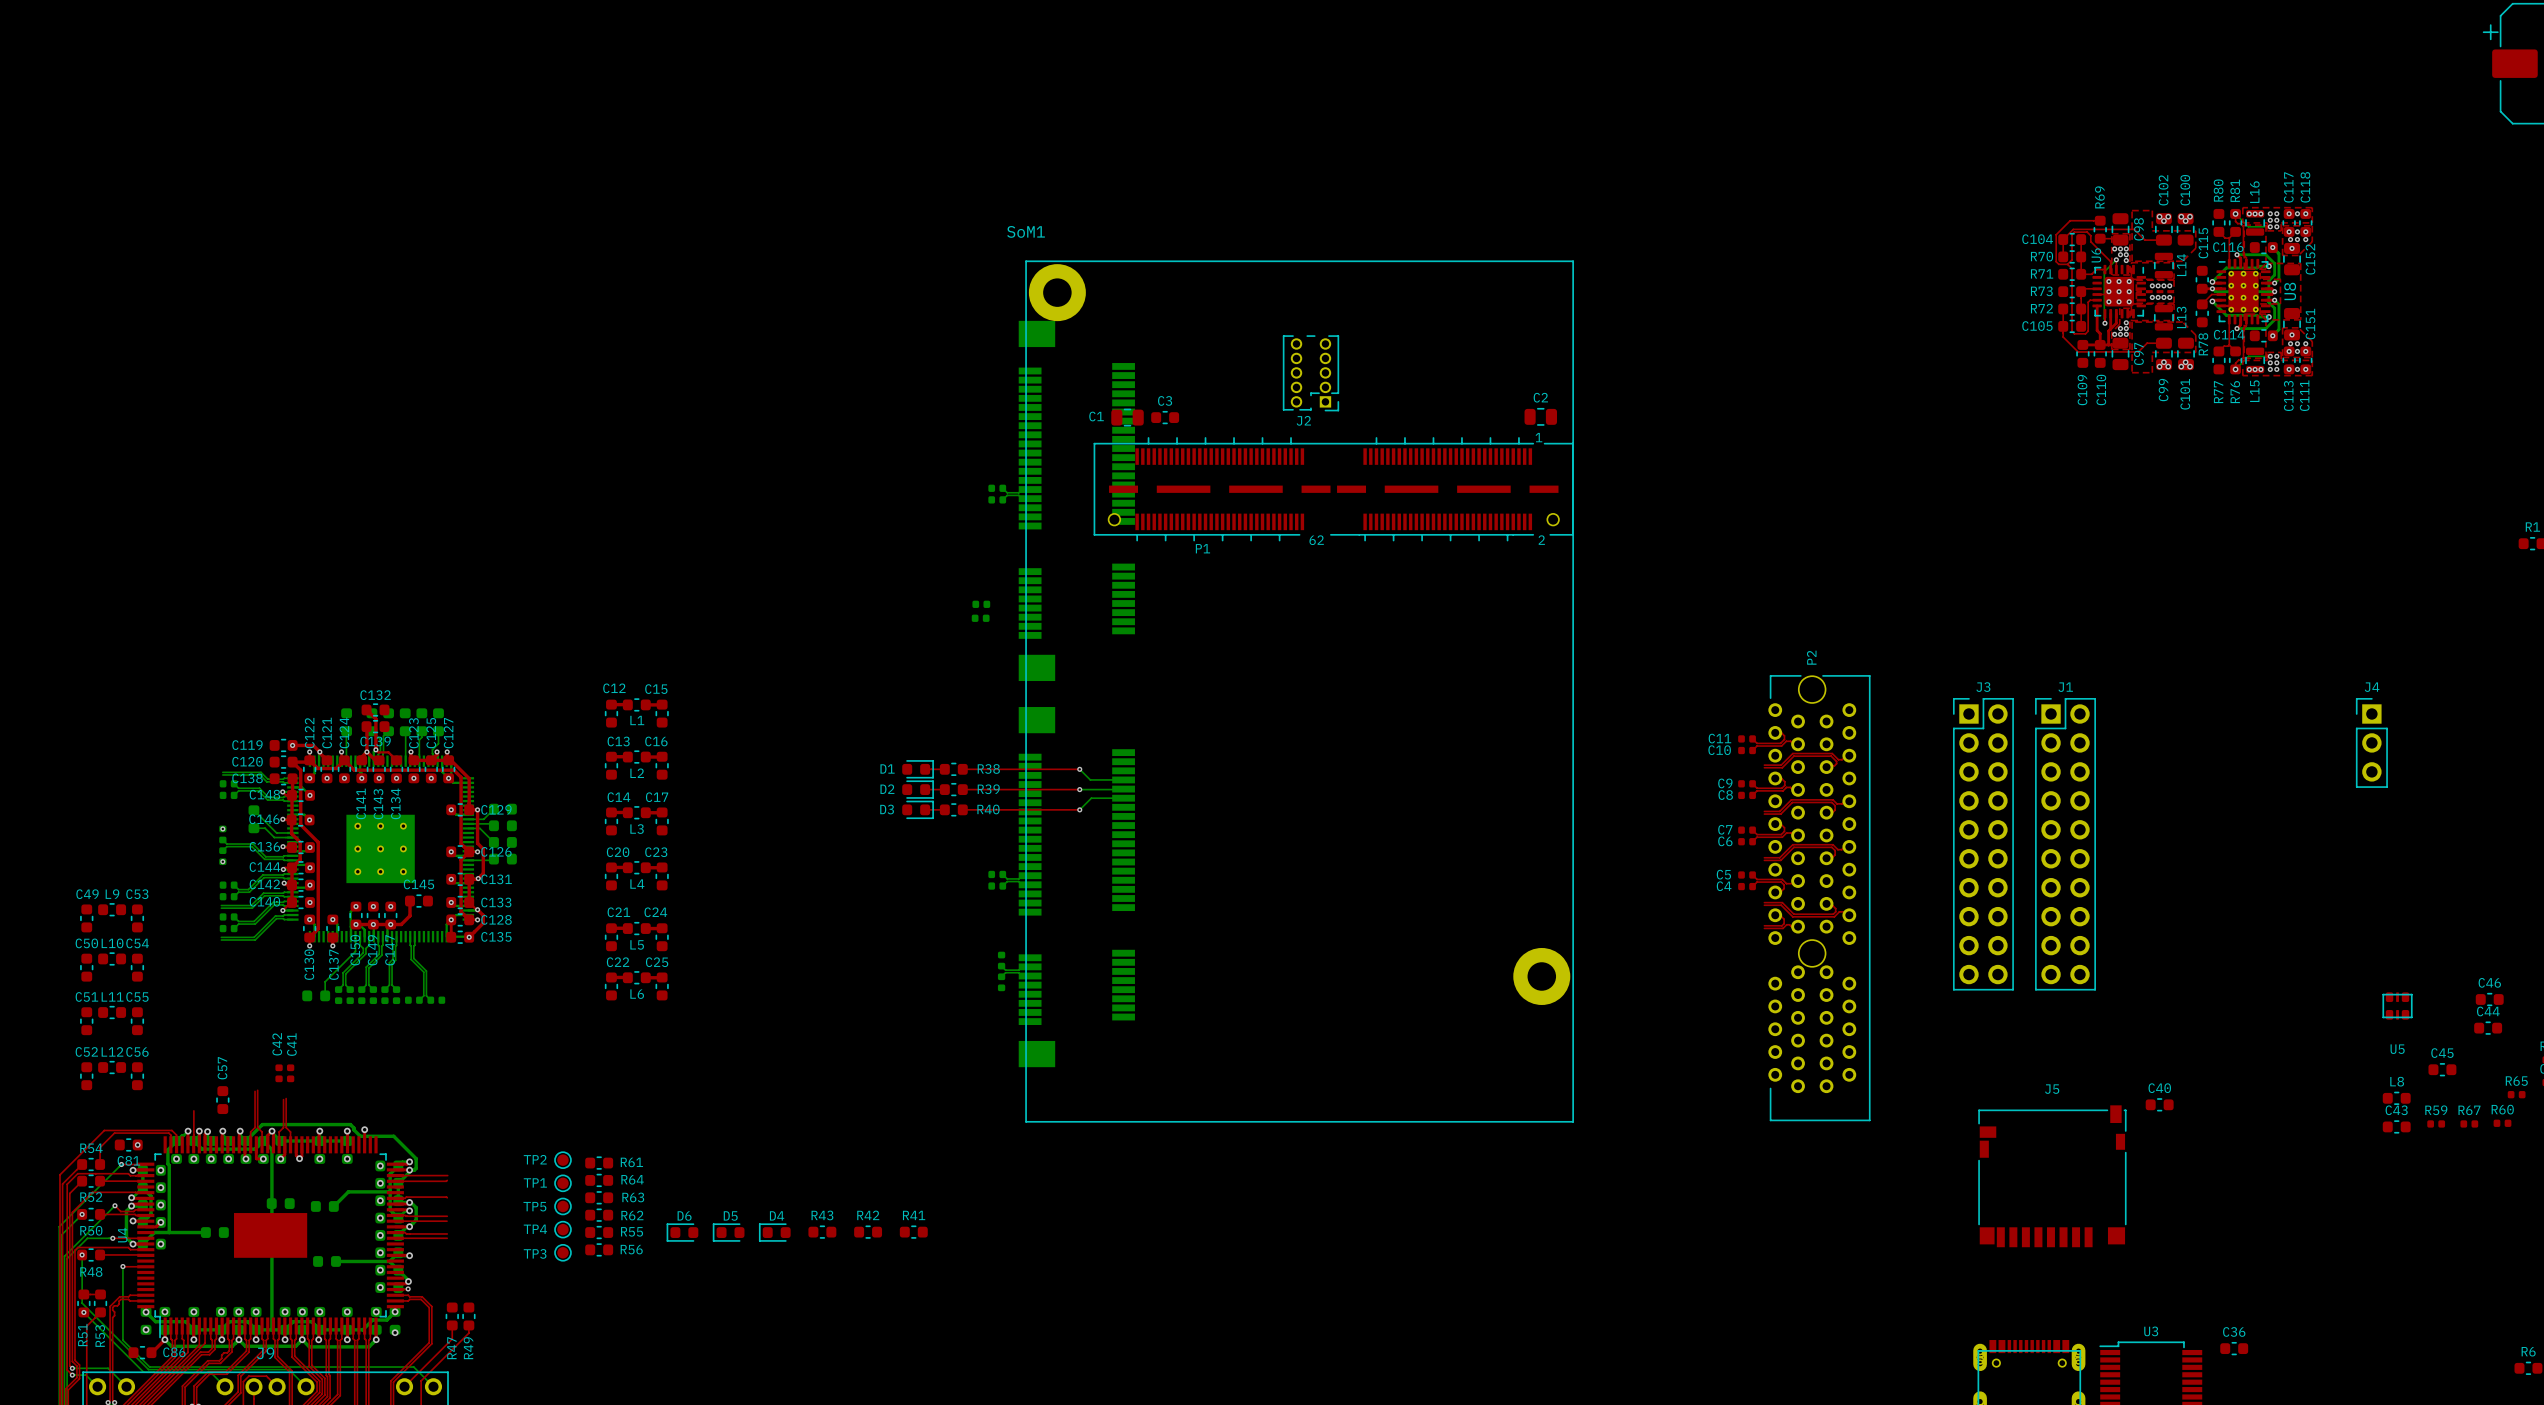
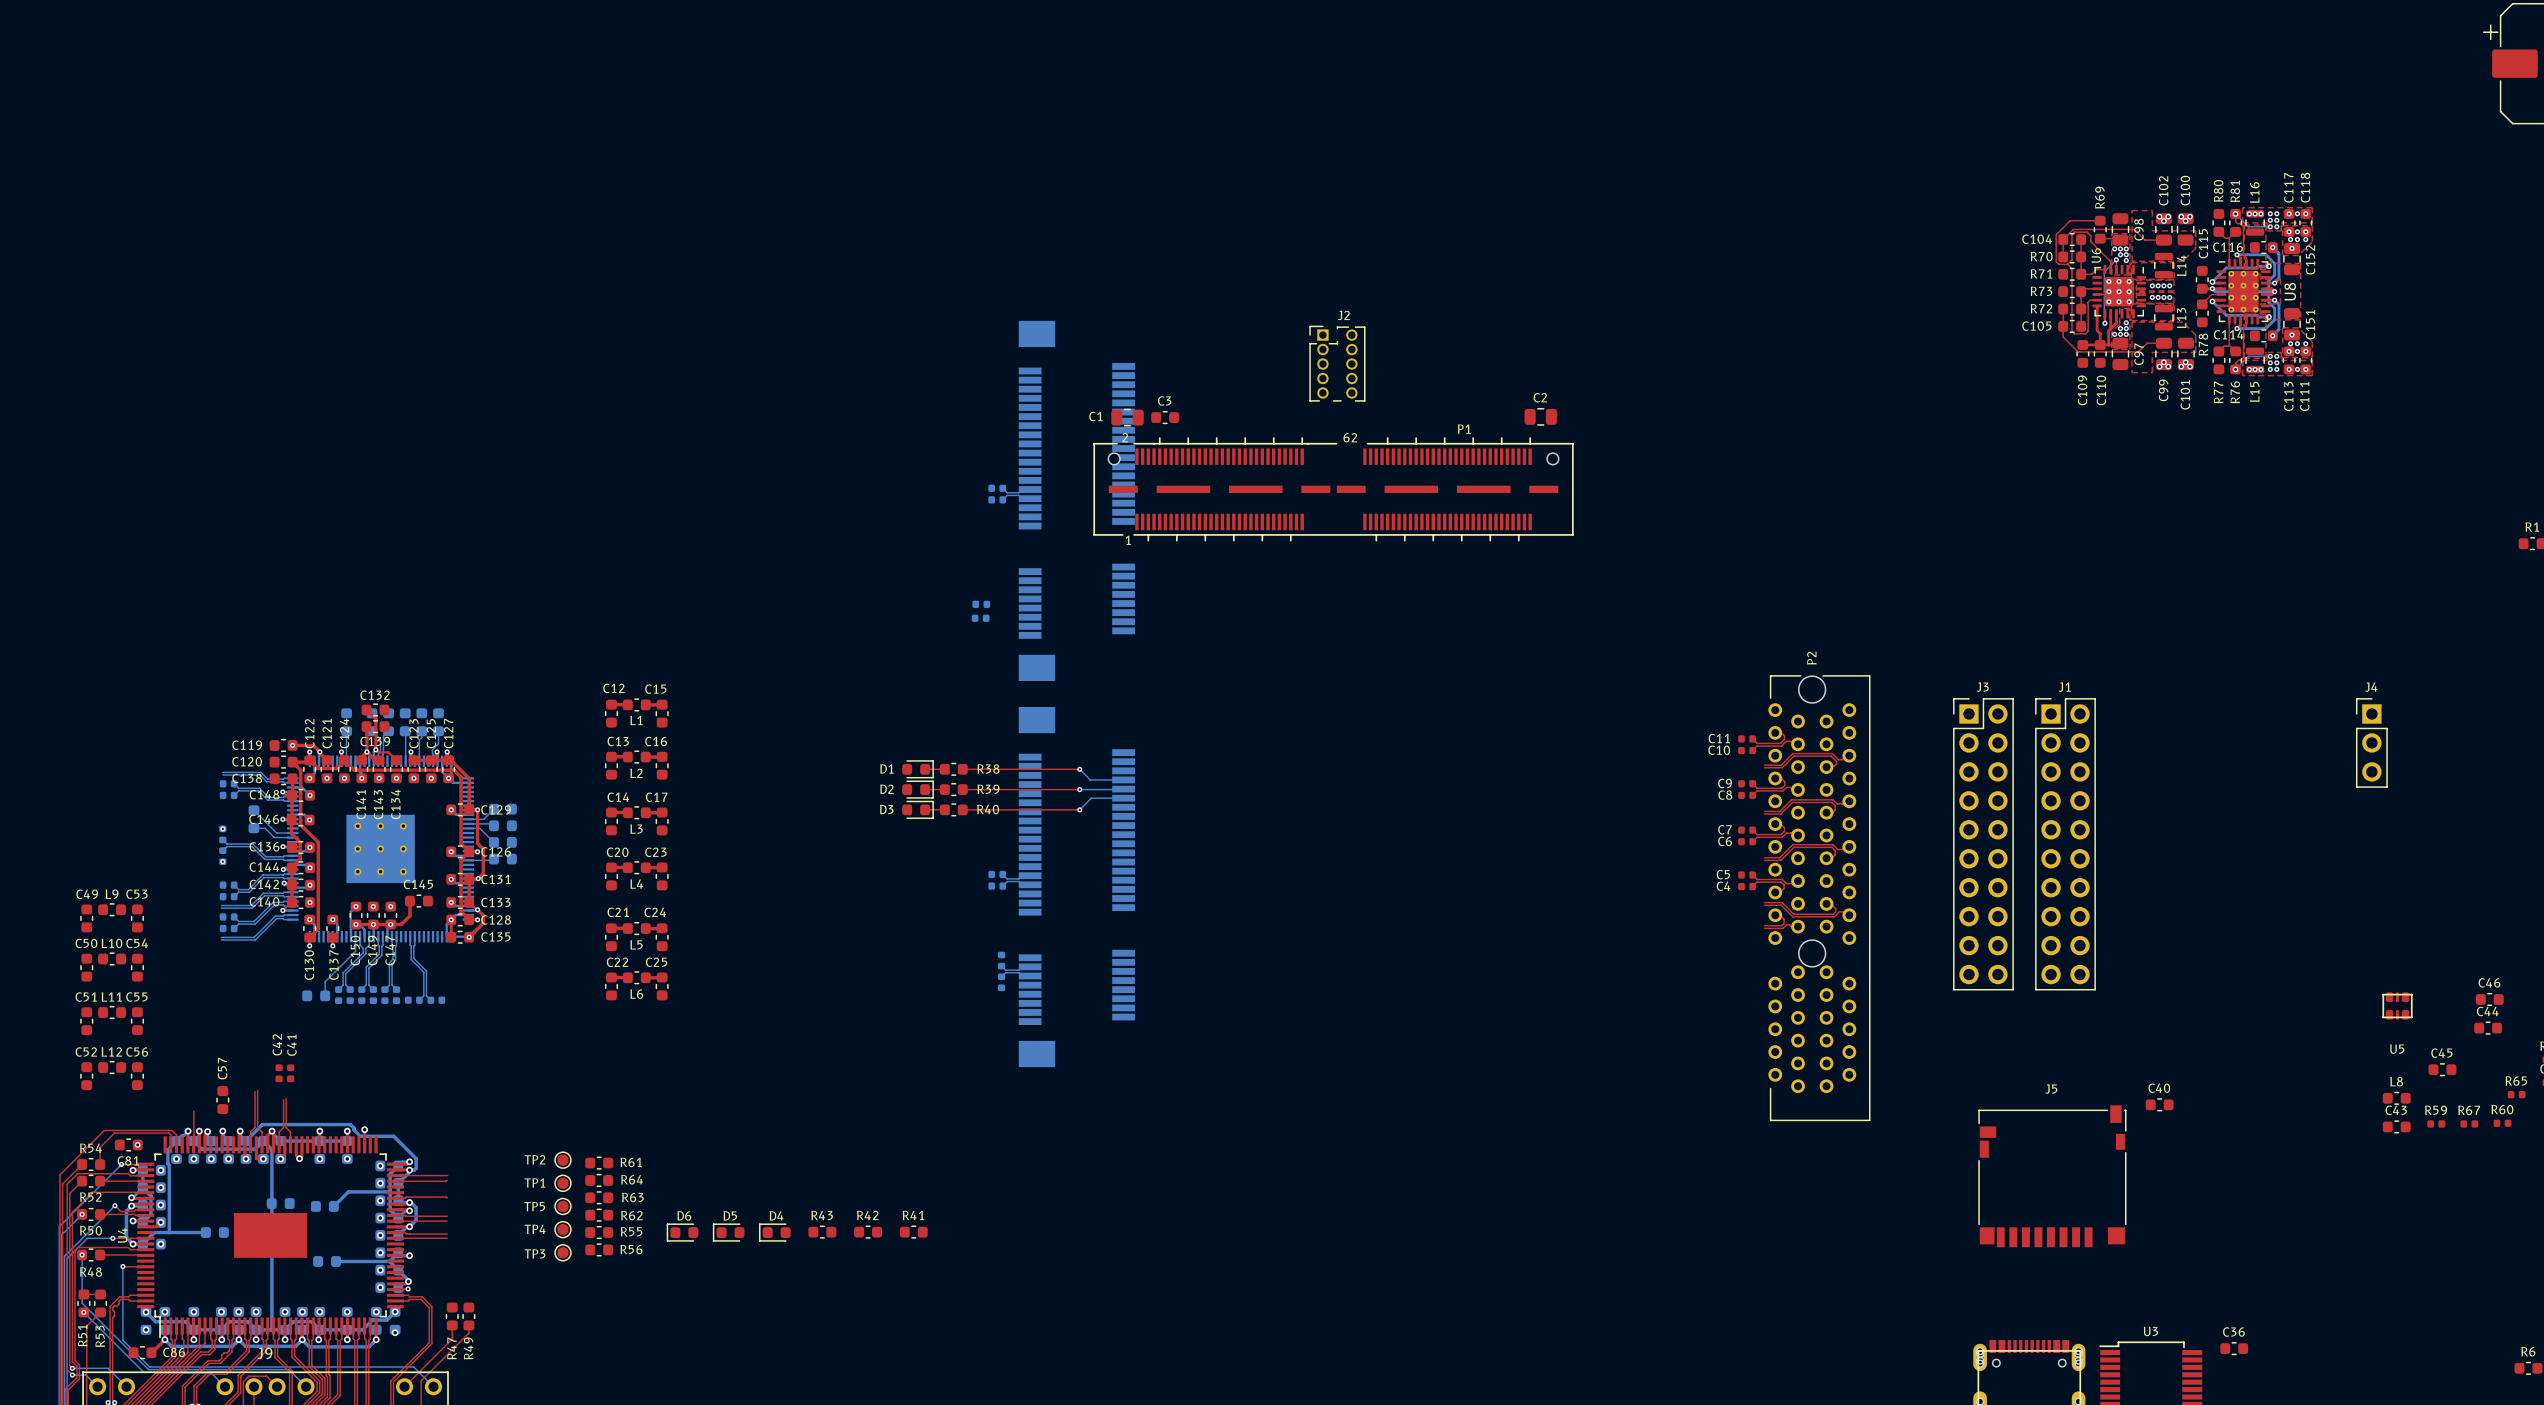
J2 rotation: 0° (1310, 373) -> 180° (1337, 363)
P1 rotation: 0° (1333, 489) -> 180° (1333, 489)
SoM1: (1299, 691) -> none

